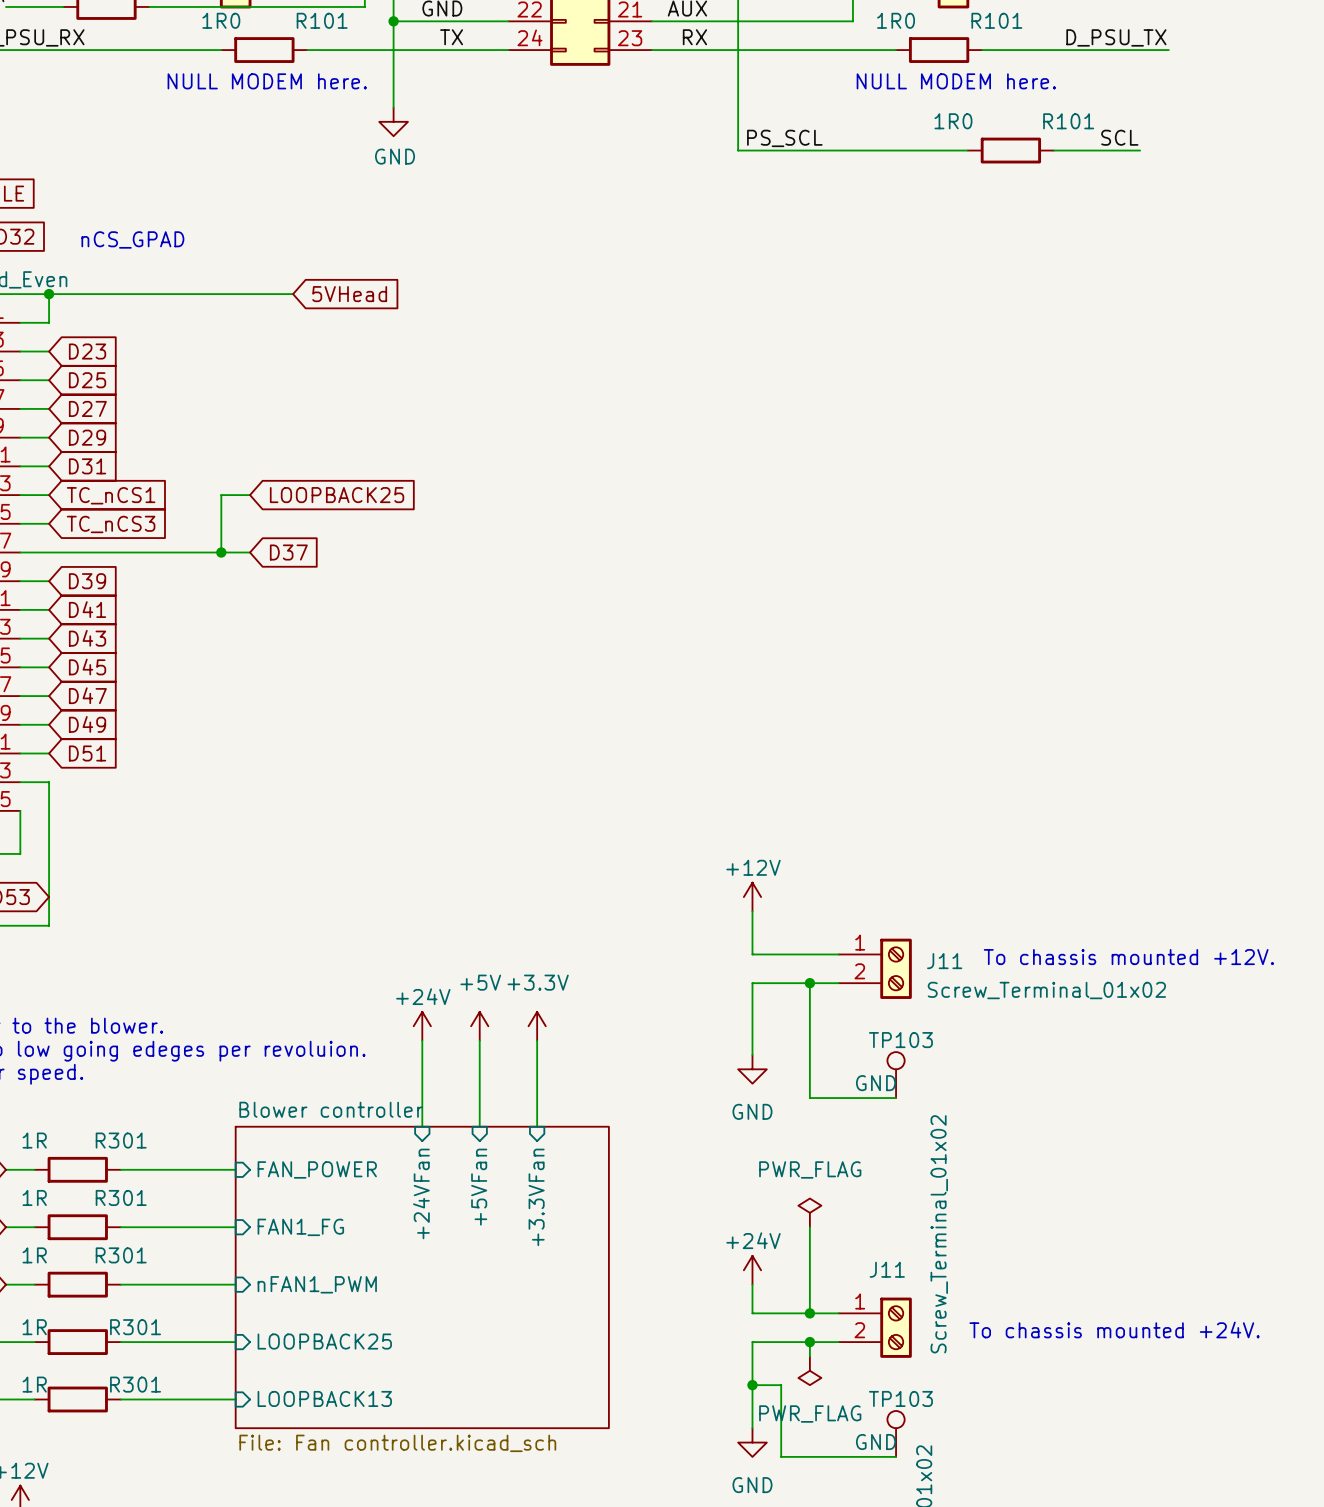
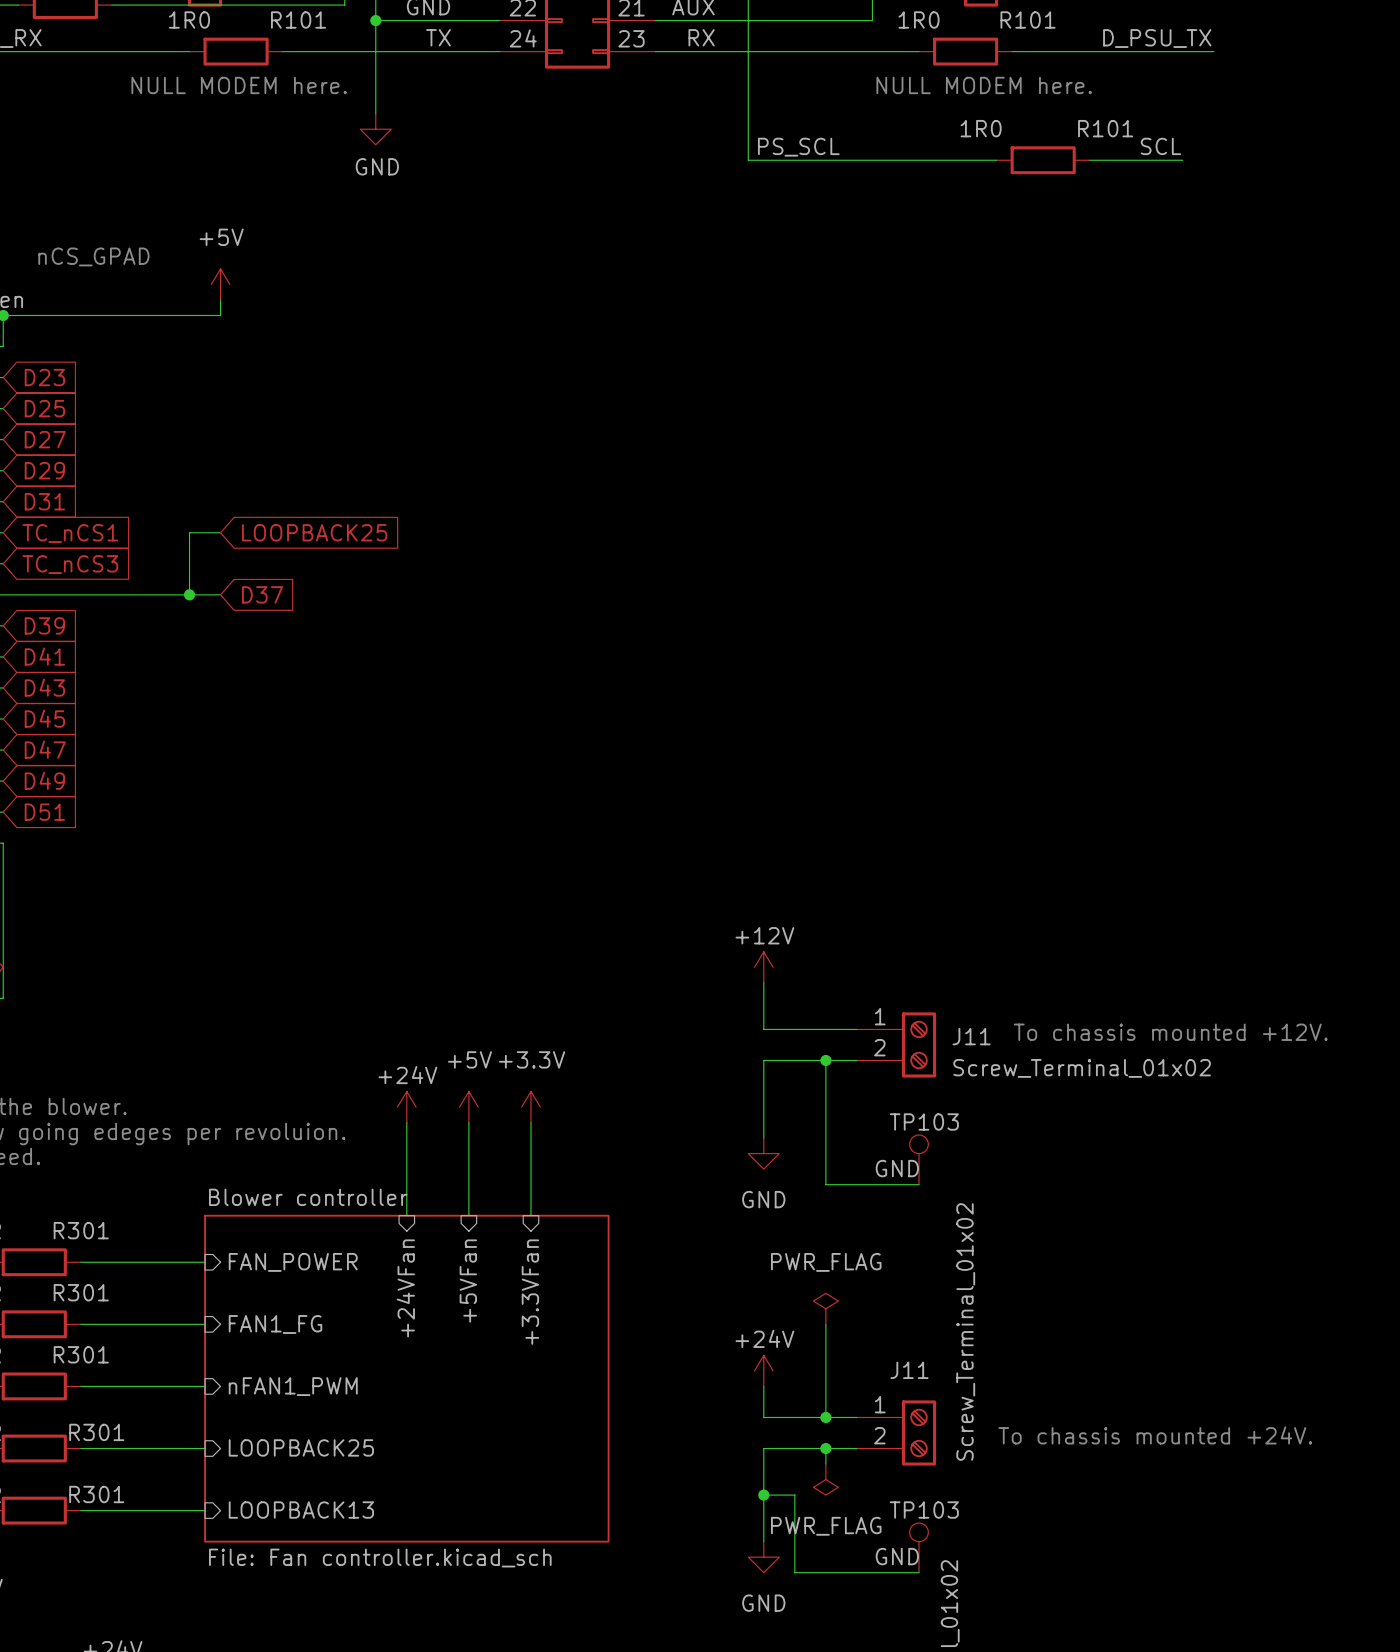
power symbol: none -> +5V (220, 284)
wire: (250, 294) (293, 294) -> (220, 315) (220, 299)
global label: 5VHead (349, 294) -> none

